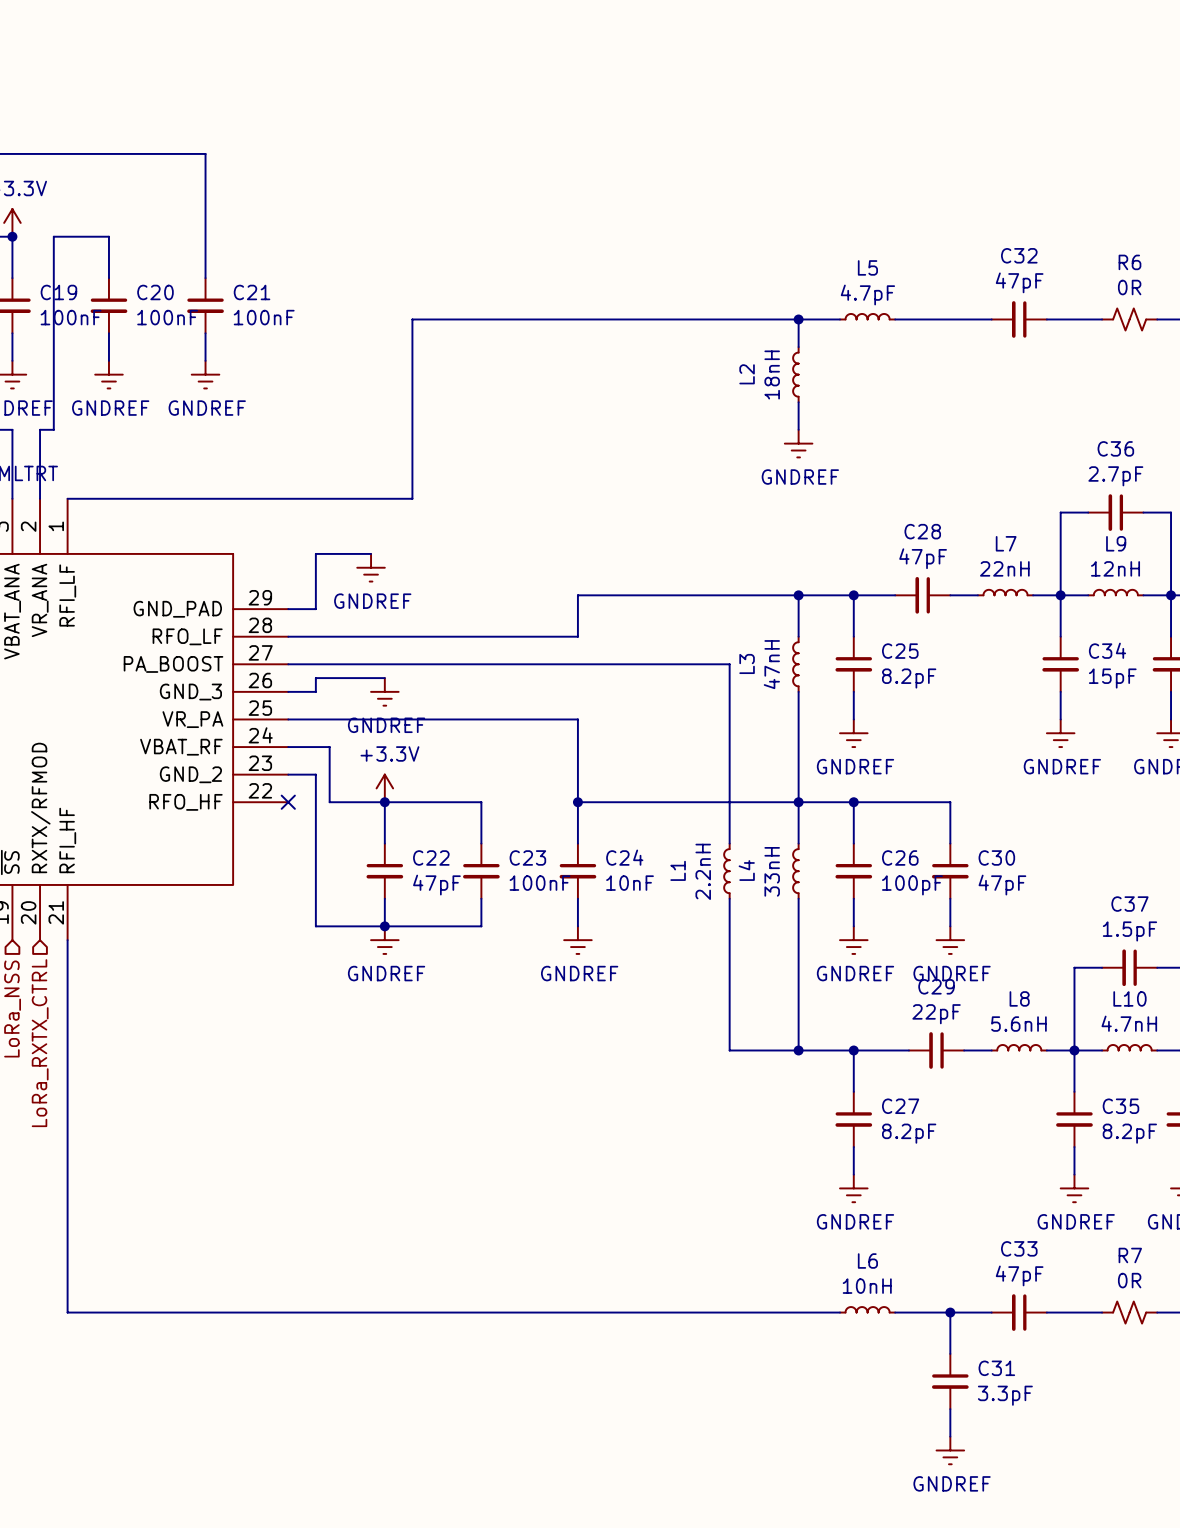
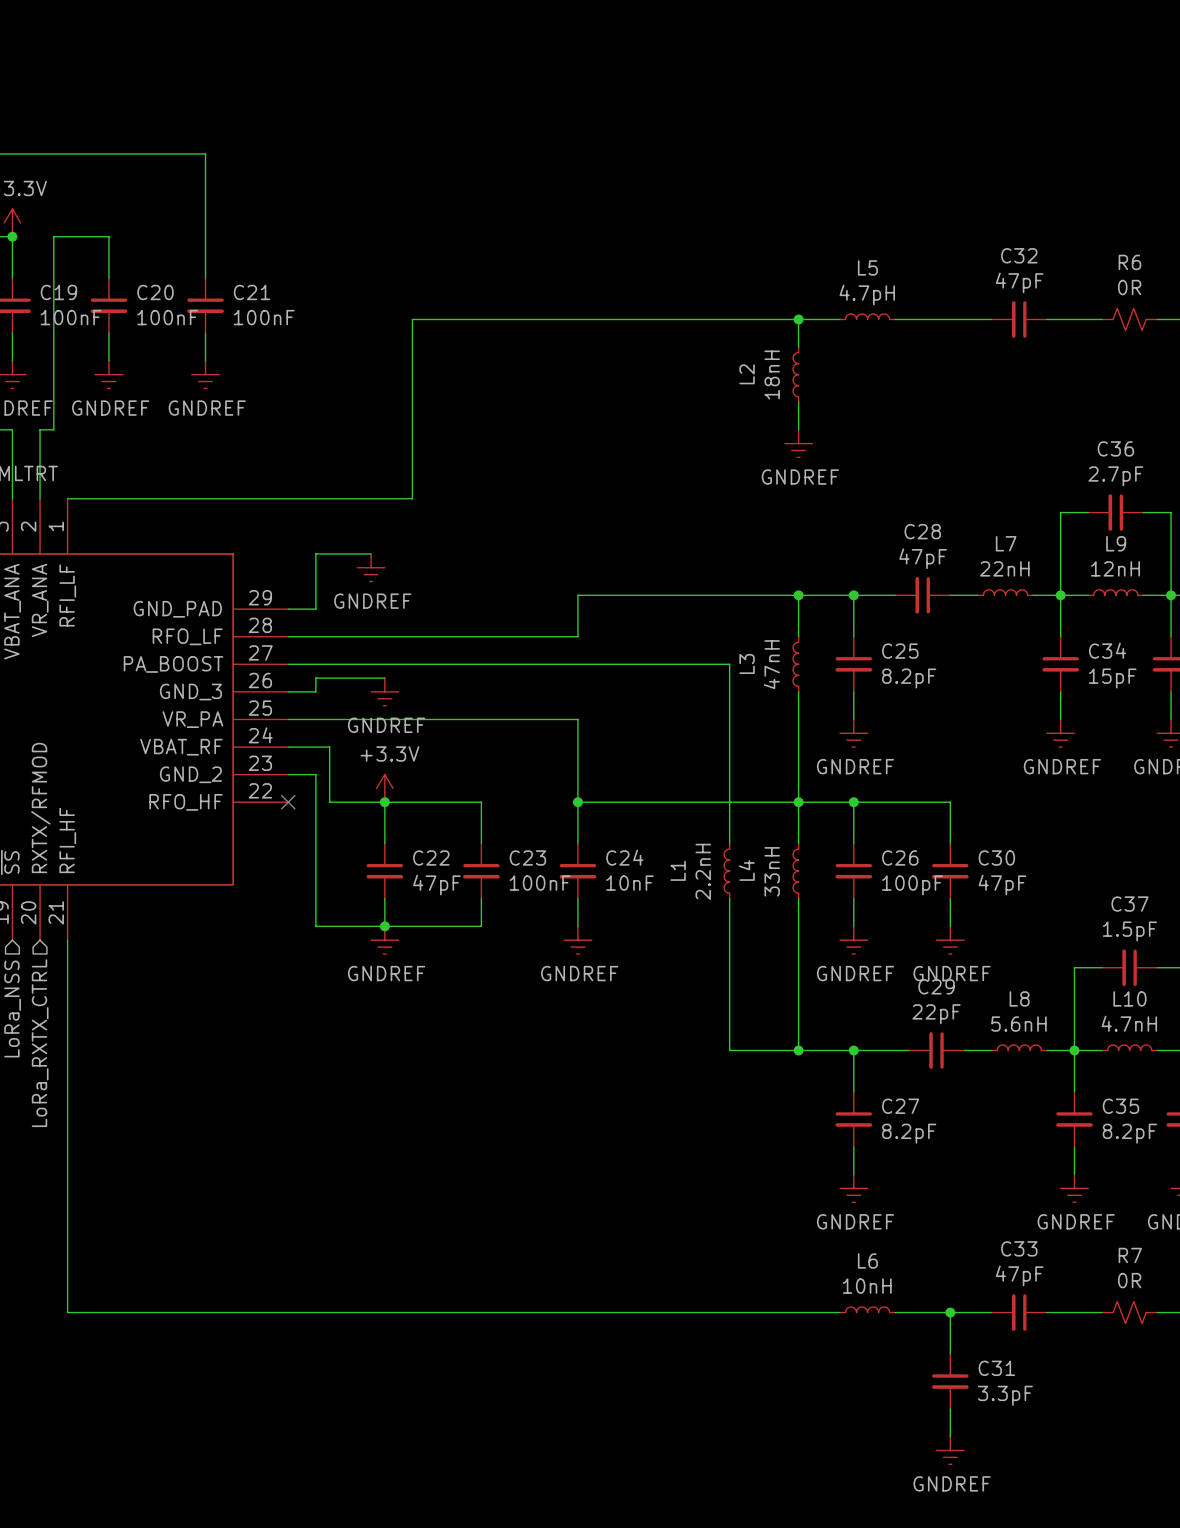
L5 value: 4.7pF (867, 295) -> 4.7pH (867, 295)

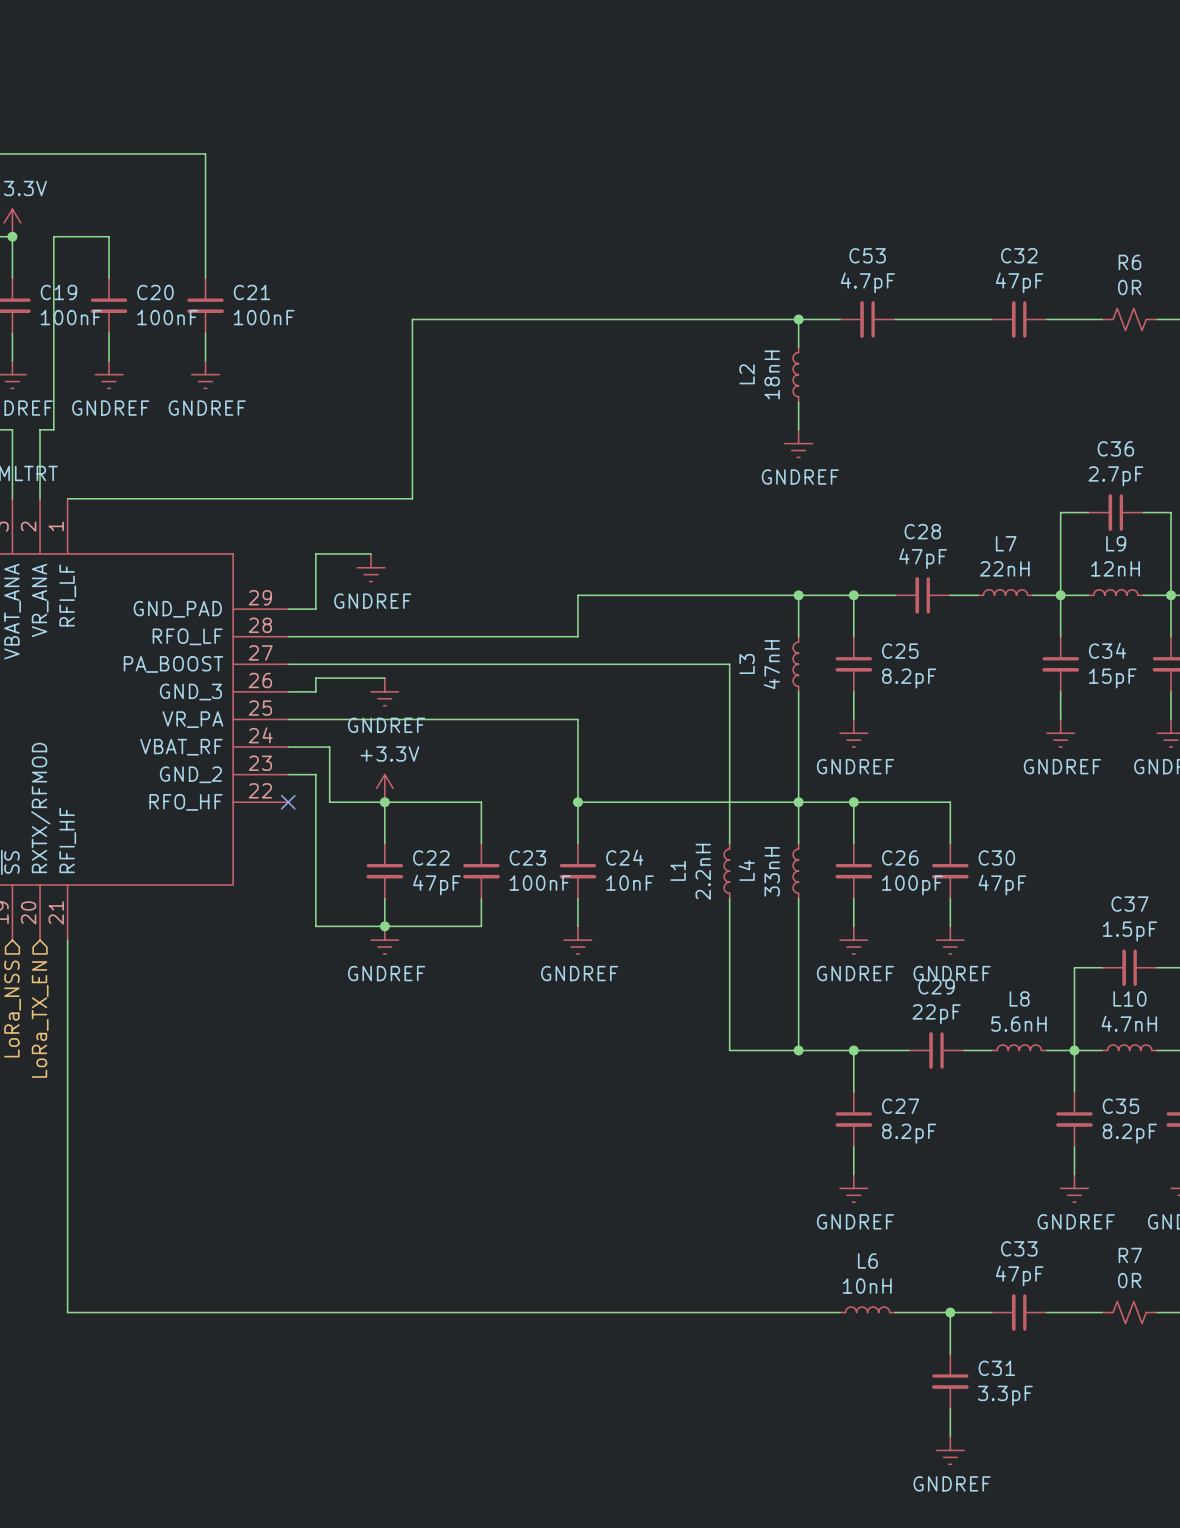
L5: 4.7pH (867, 316) -> none
C53: none -> 4.7pF (867, 319)
hierarchical label: LoRa_RXTX_CTRL (40, 1043) -> LoRa_TX_EN (40, 1019)

